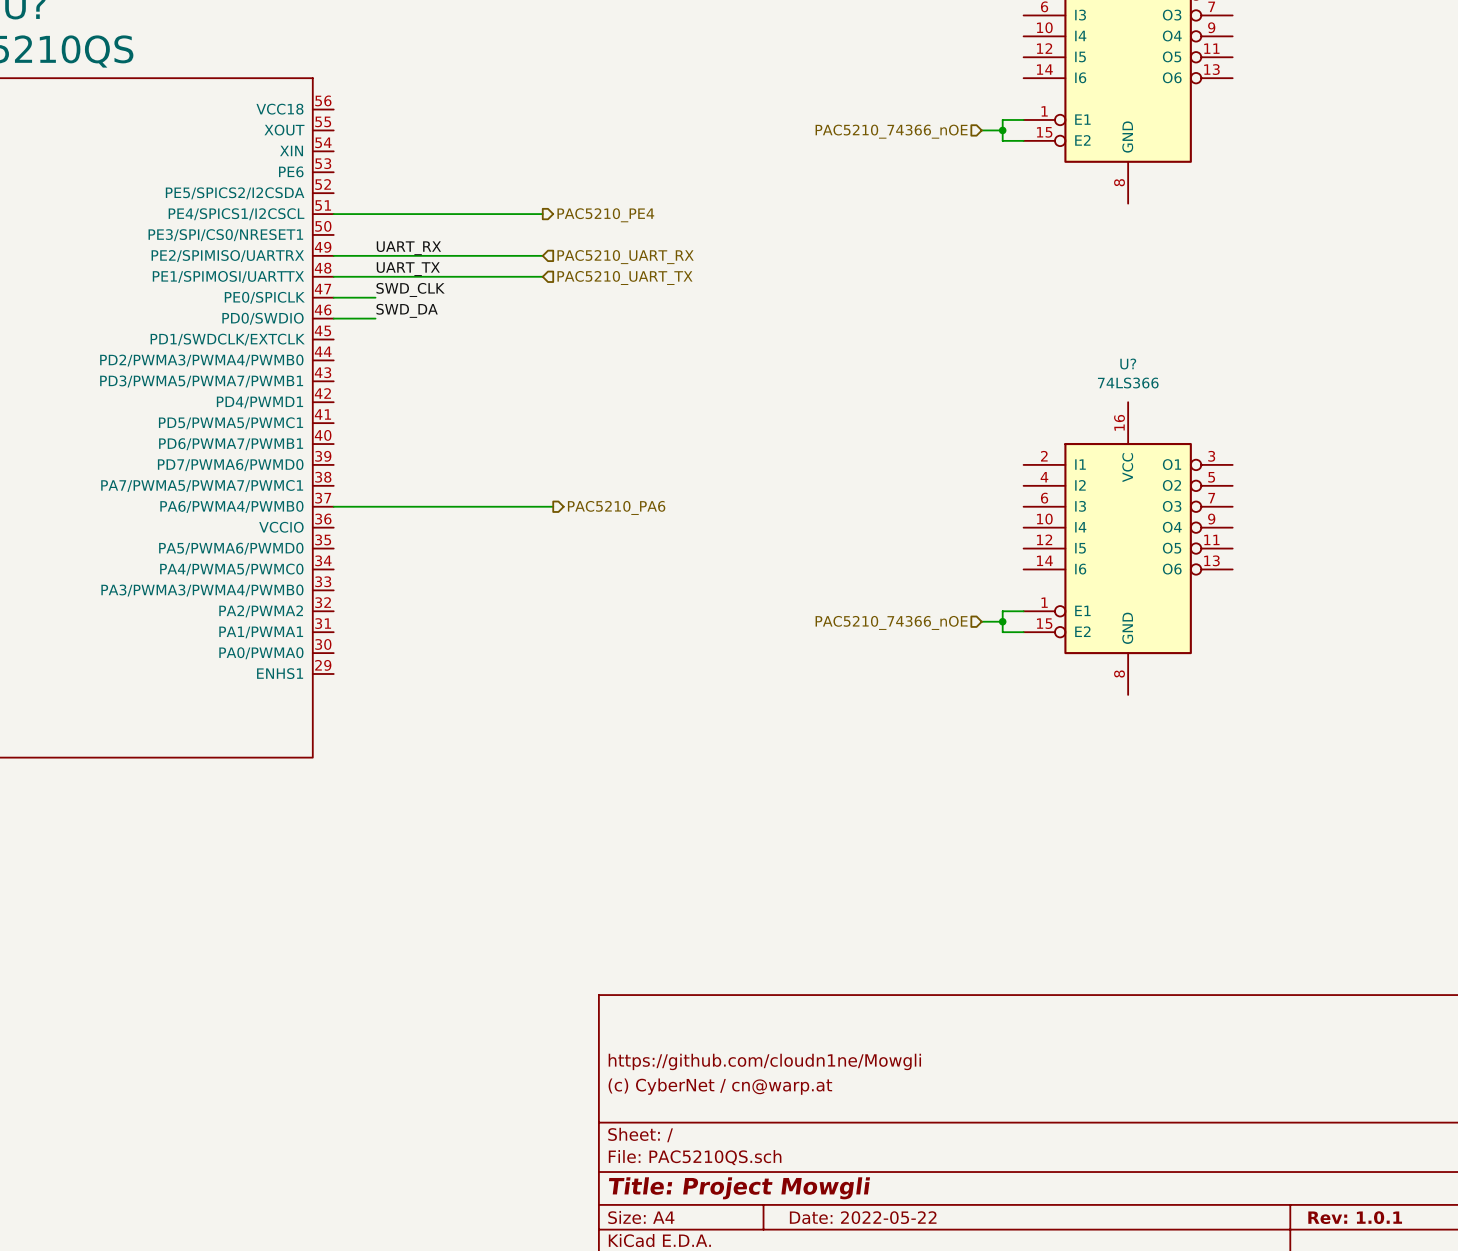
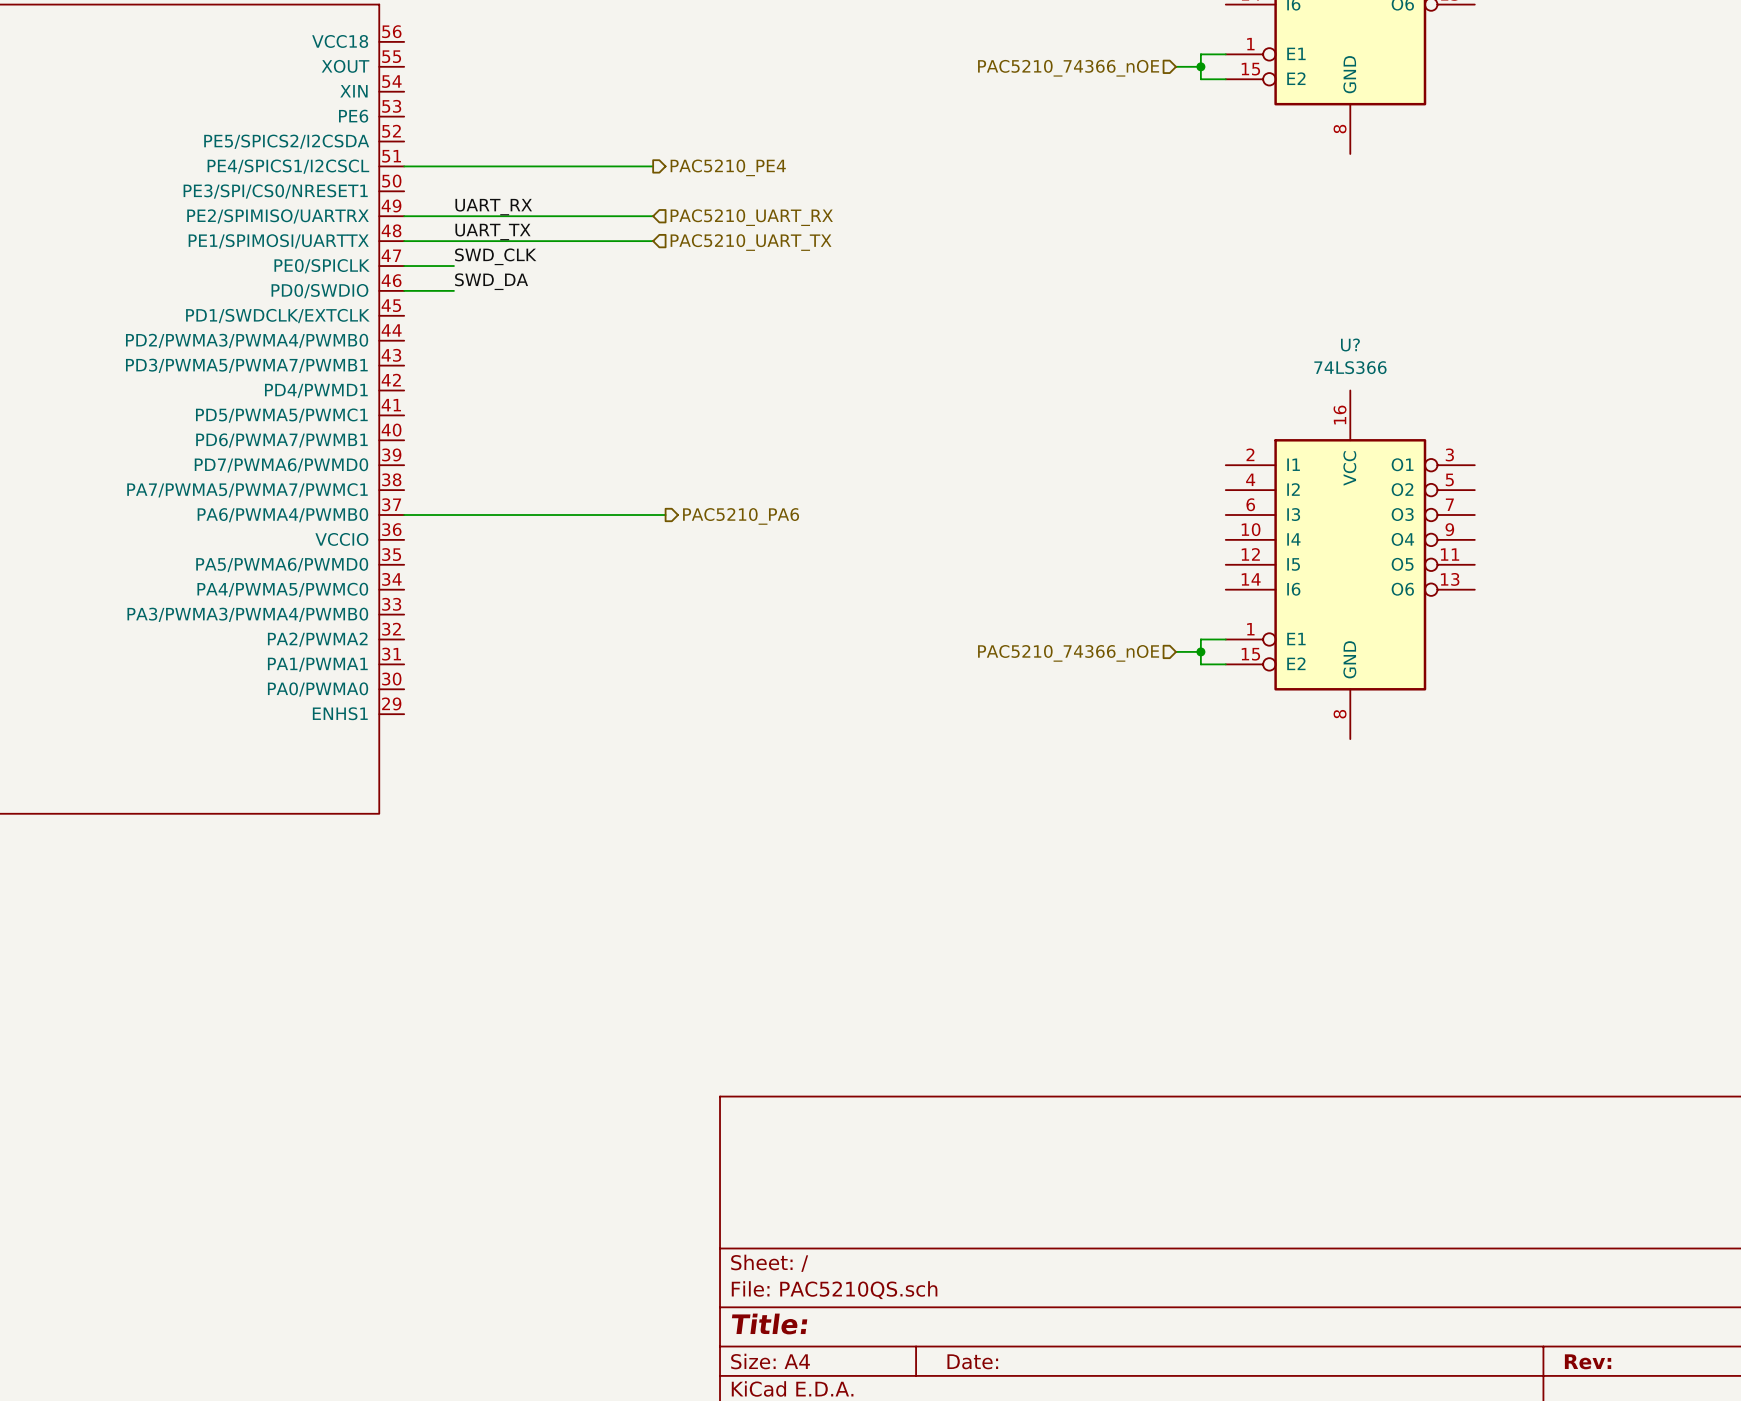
title block: https://github.com/cloudn1ne/Mowgli (764, 1061) -> none
title block: (c) CyberNet / cn@warp.at (720, 1086) -> none
title block: Title: Project Mowgli (739, 1188) -> Title: (769, 1324)
title block: Date: 2022-05-22 (863, 1217) -> Date: (972, 1361)
title block: Rev: 1.0.1 (1355, 1217) -> Rev: (1588, 1361)

